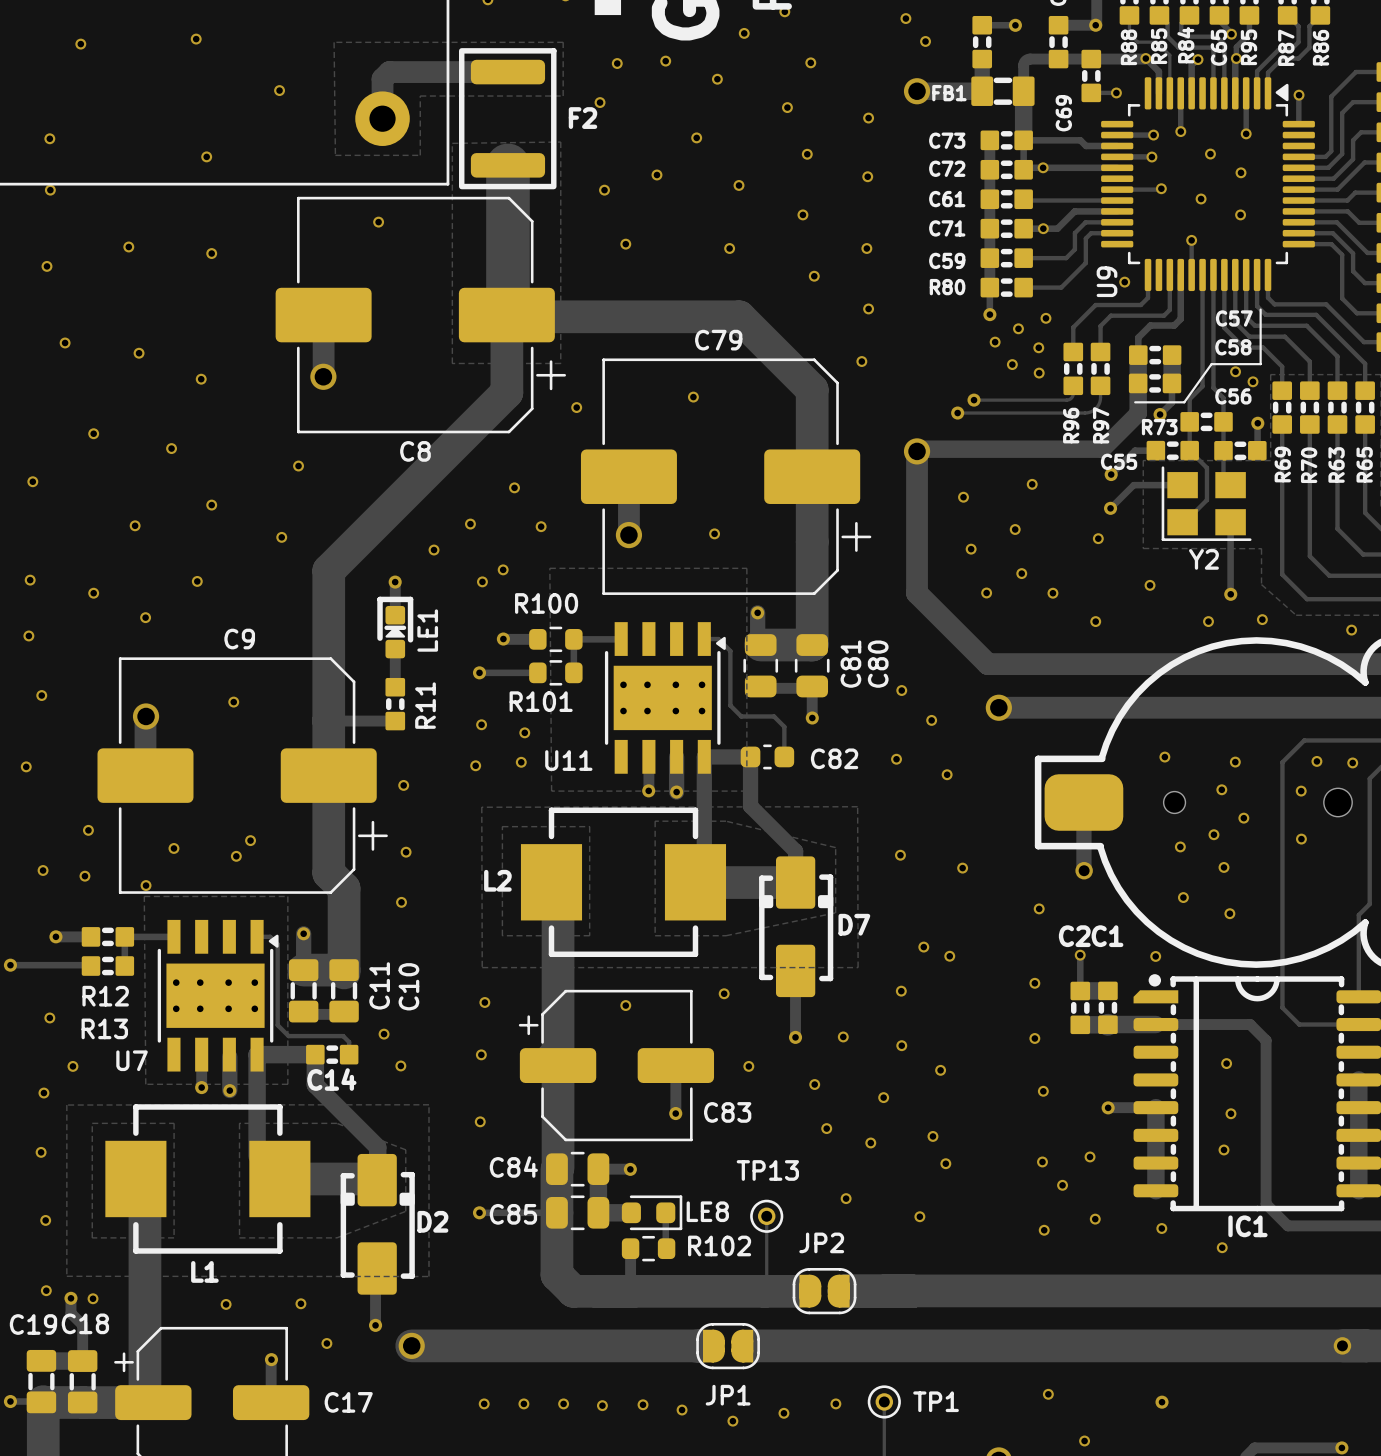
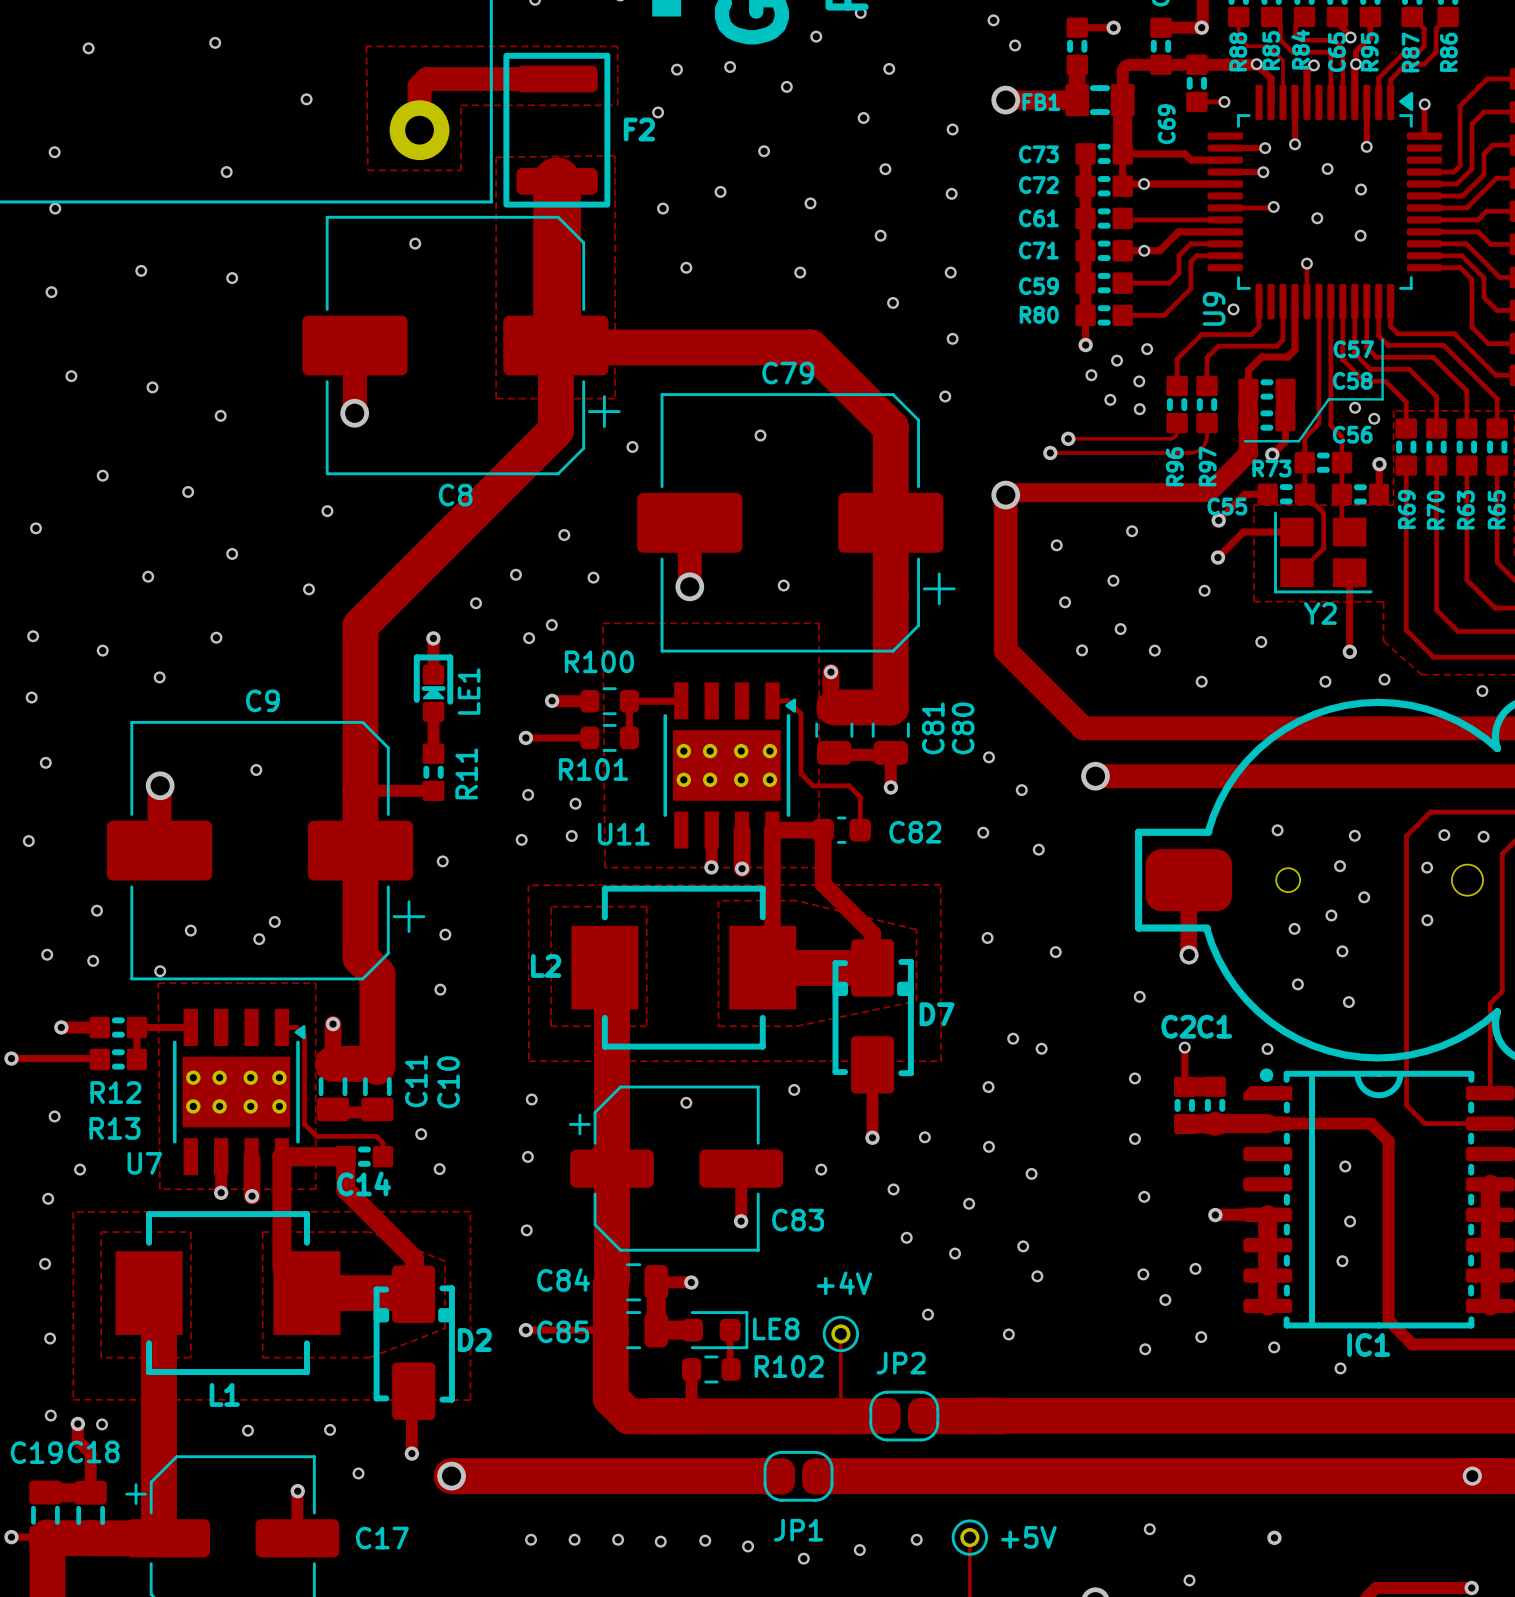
TP13 name: TP13 (767, 1170) -> +4V (844, 1283)
TP1 name: TP1 (936, 1401) -> +5V (1028, 1537)

